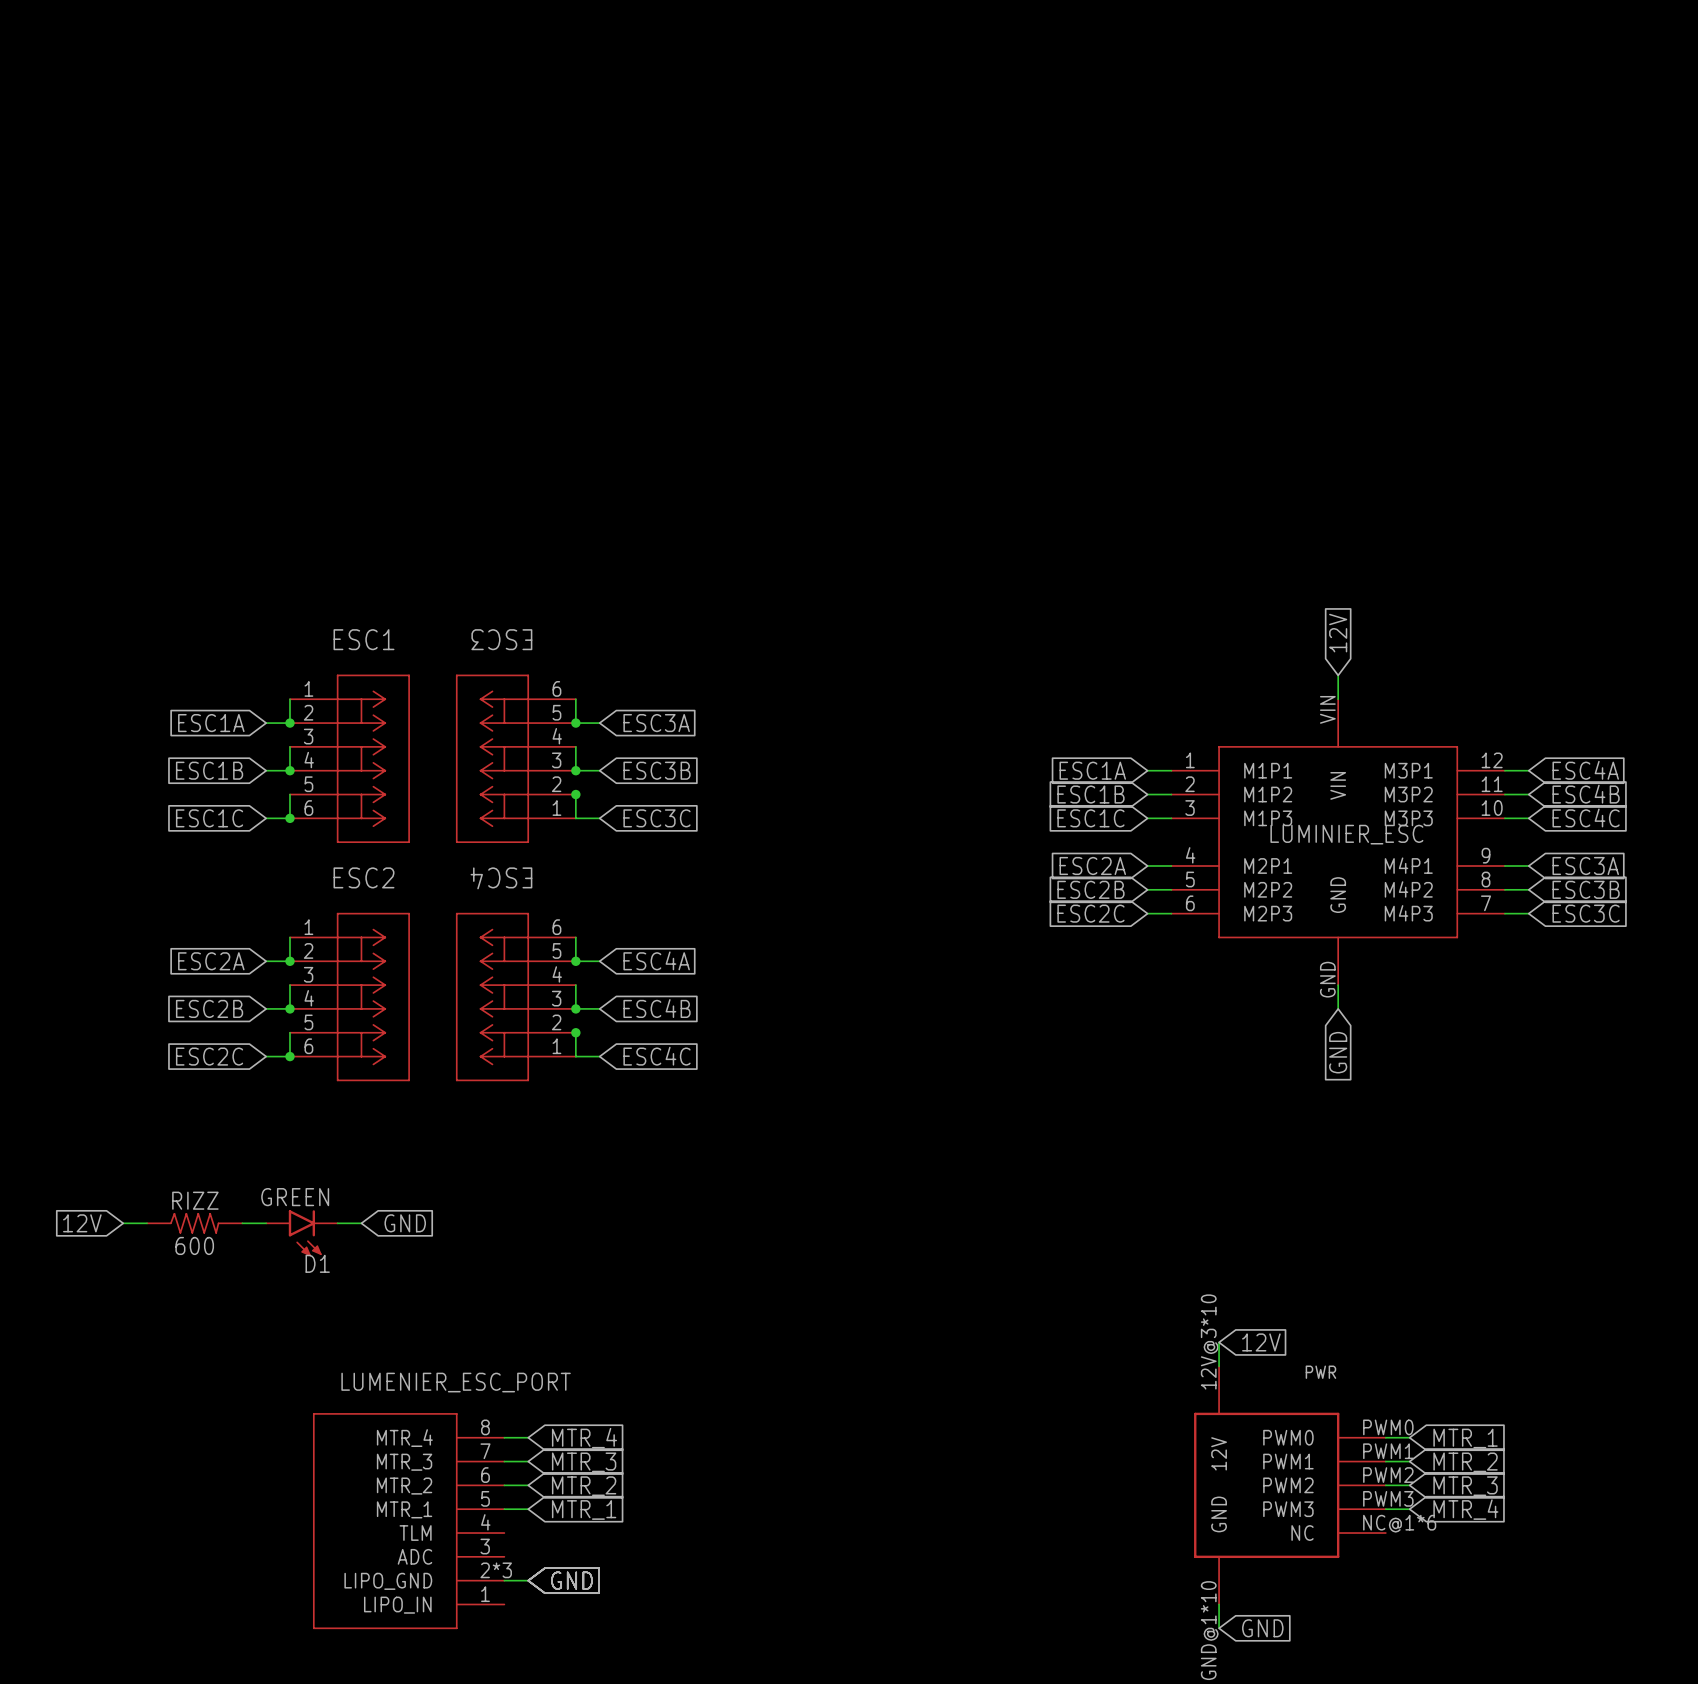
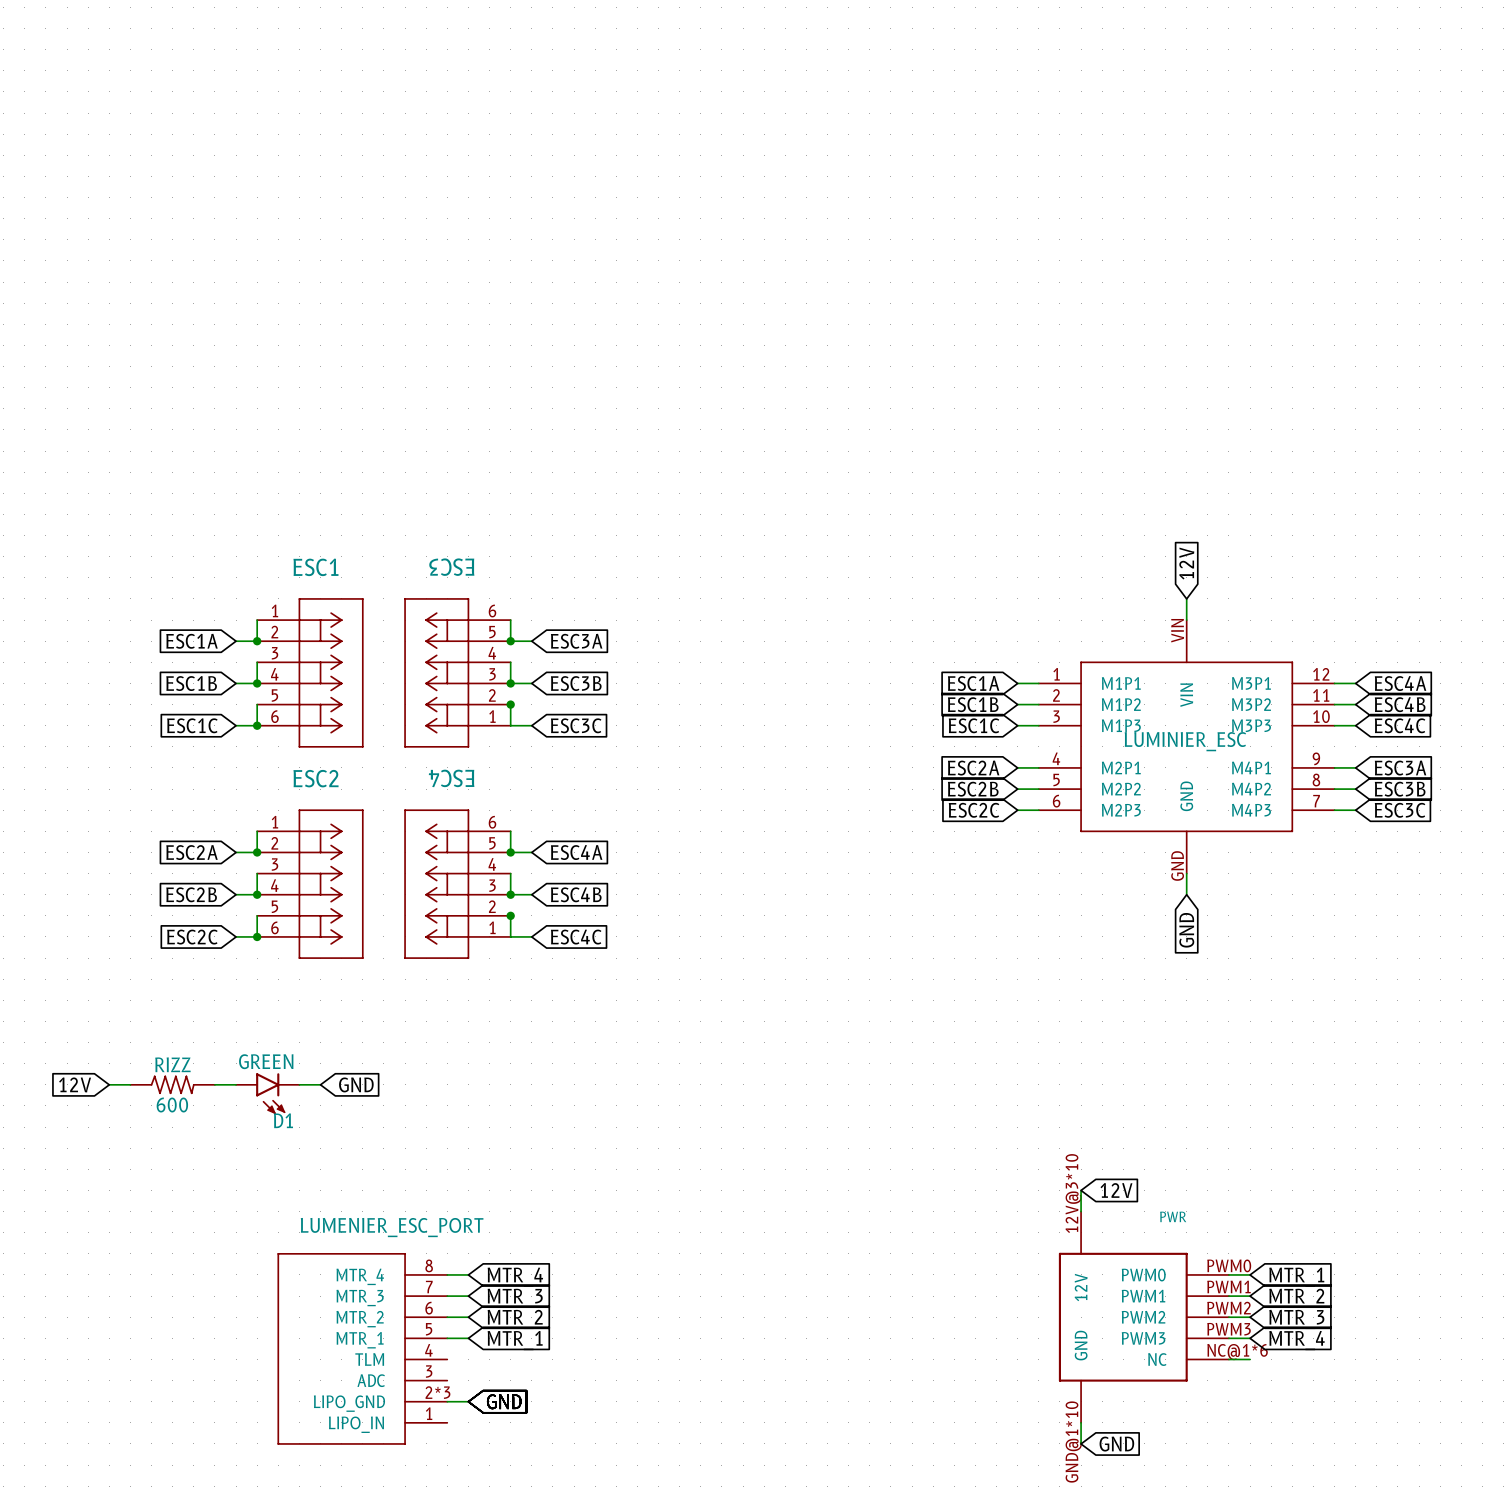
wire: none -> (1228, 1359) (1250, 1359)

